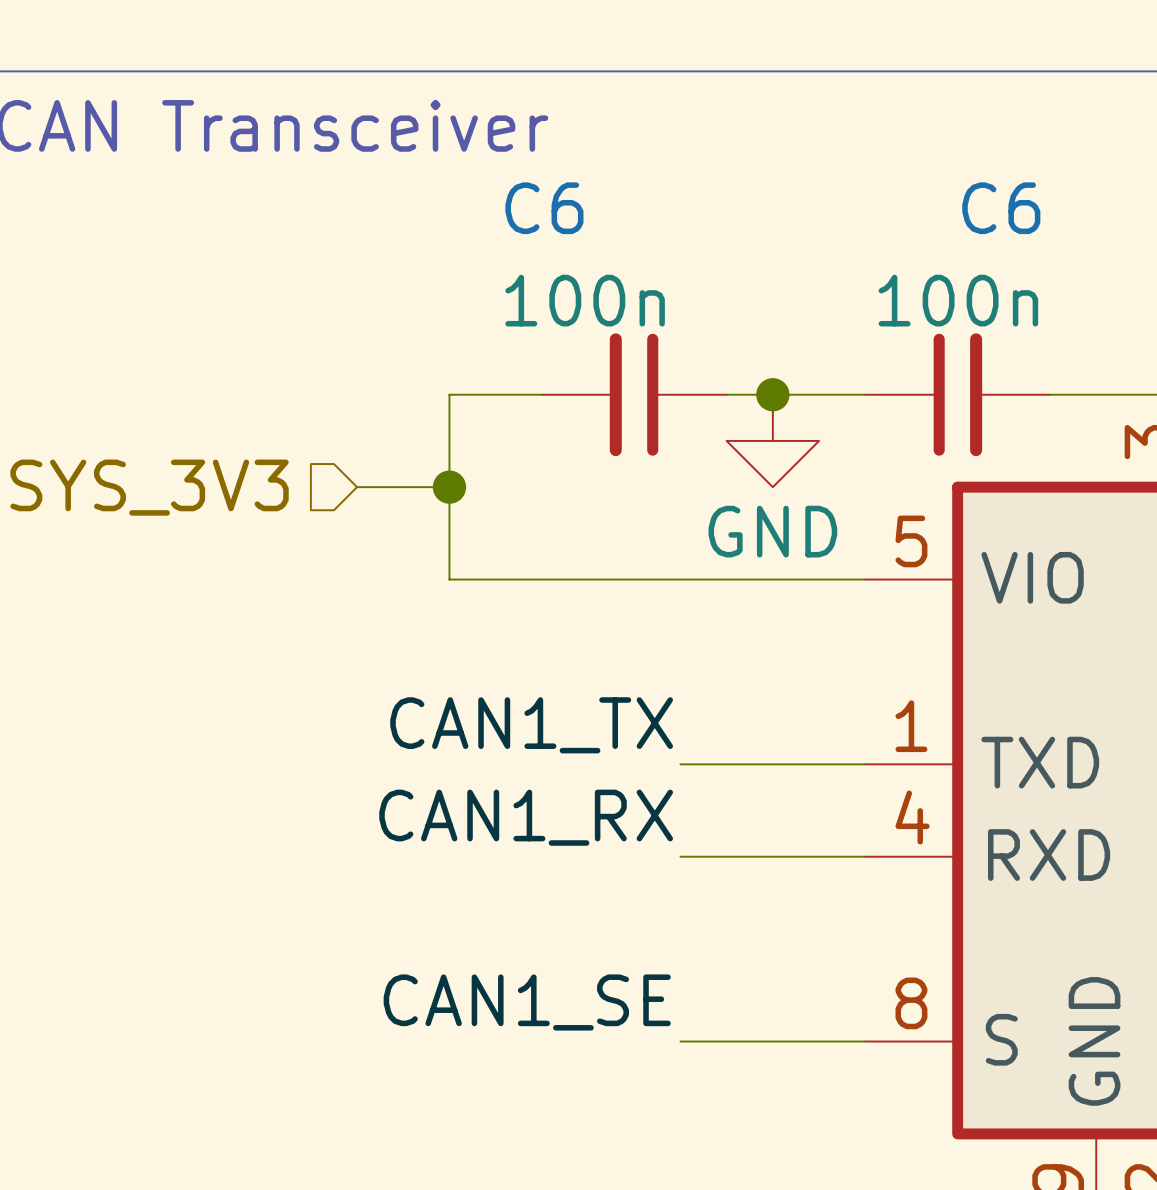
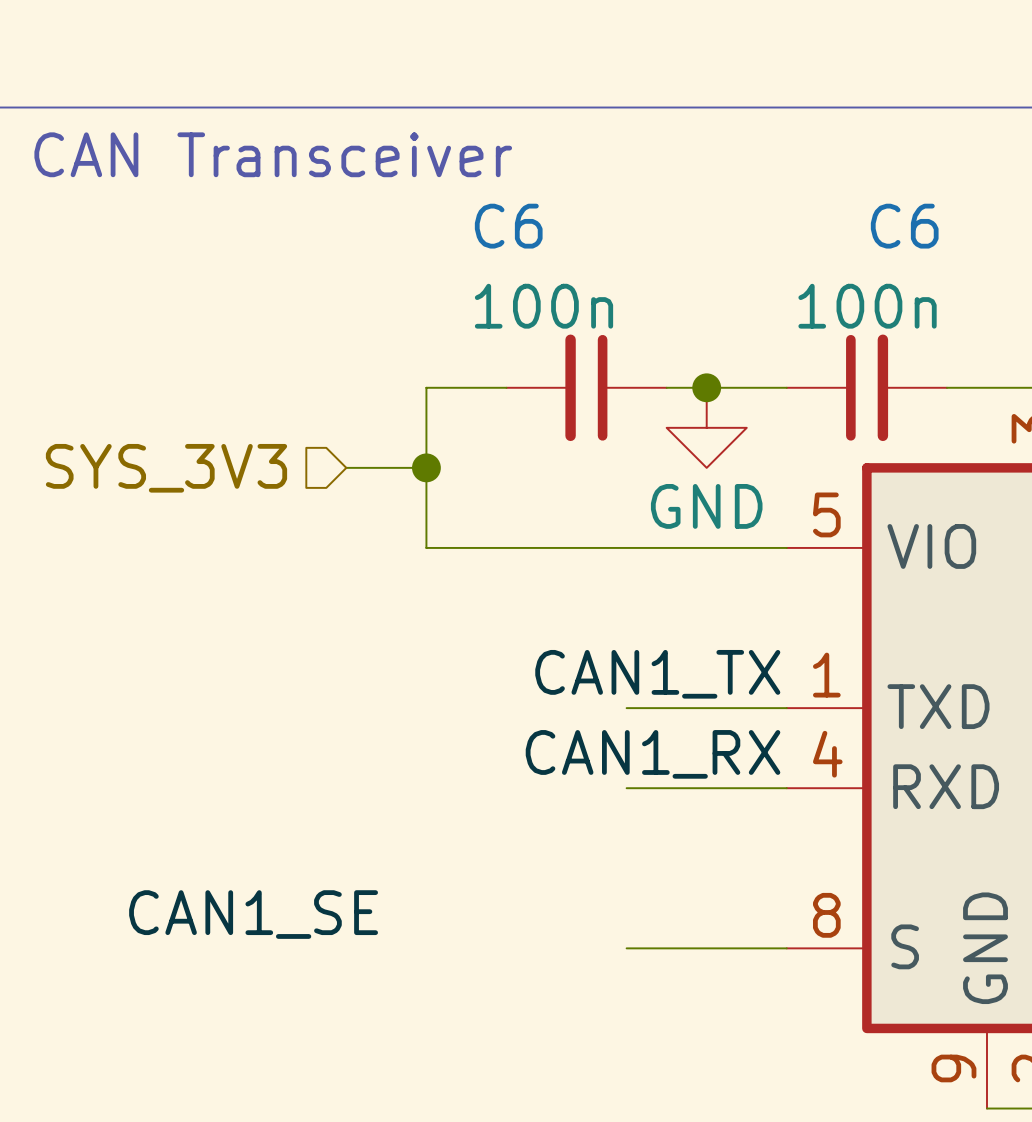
label position: CAN1_TX (531, 725) -> CAN1_TX (657, 674)
label position: CAN1_RX (526, 817) -> CAN1_RX (653, 754)
label position: CAN1_SE (527, 1002) -> CAN1_SE (253, 914)

